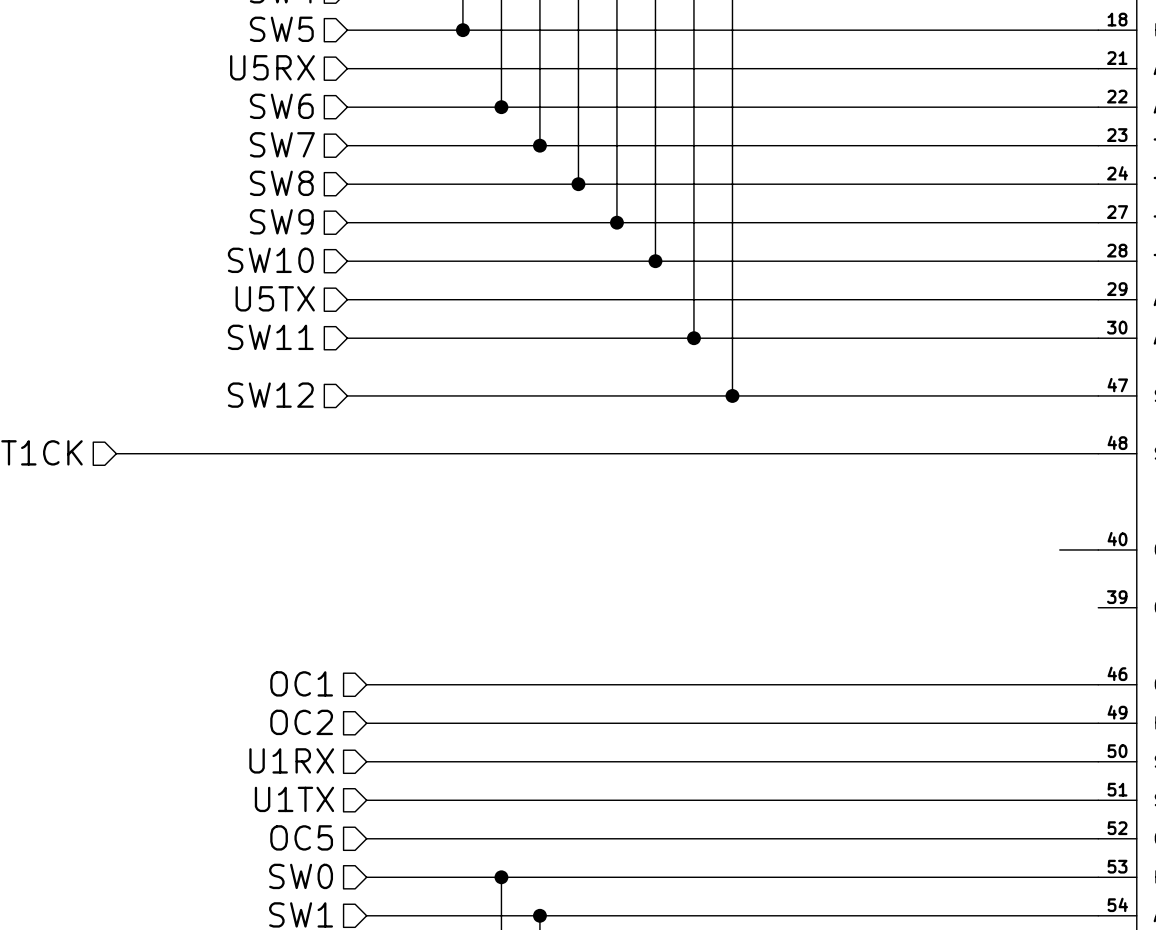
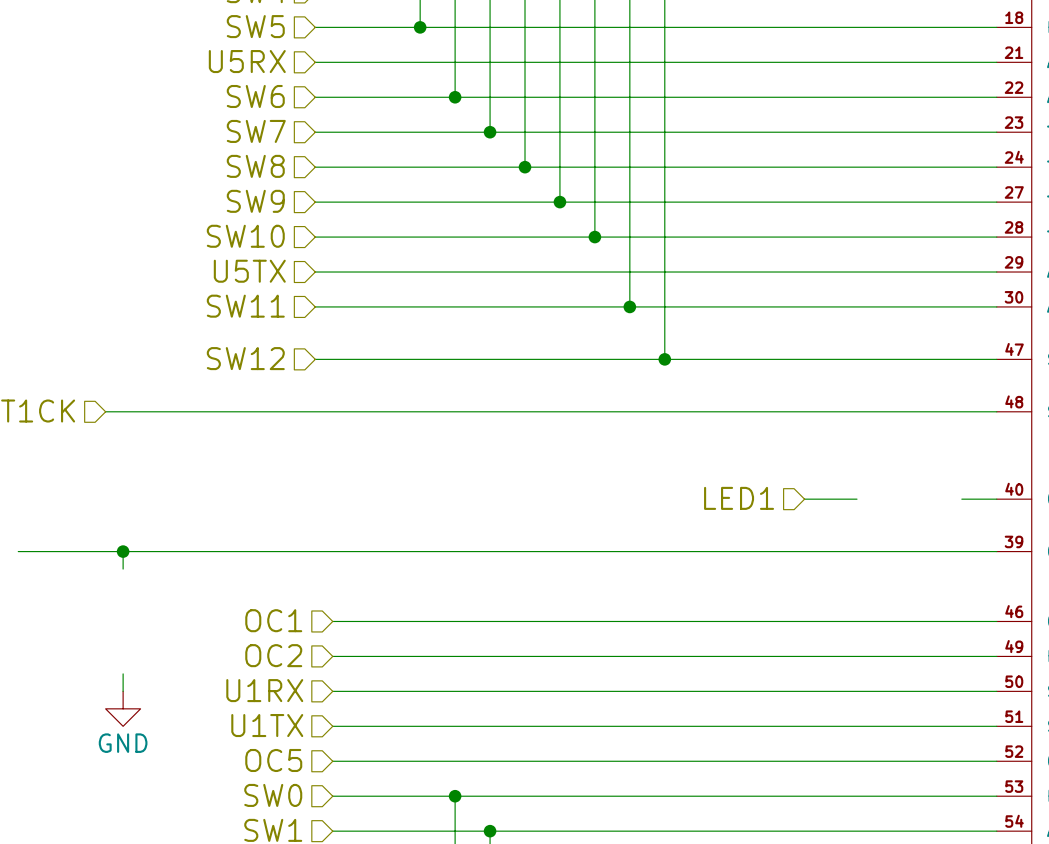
hierarchical label: none -> LED1 (739, 498)
wire: none -> (804, 499) (857, 499)
wire: none -> (18, 551) (996, 551)
wire: none -> (123, 551) (123, 569)
junction: none -> (123, 551)
wire: none -> (123, 673) (123, 691)
power symbol: none -> GND (123, 708)

